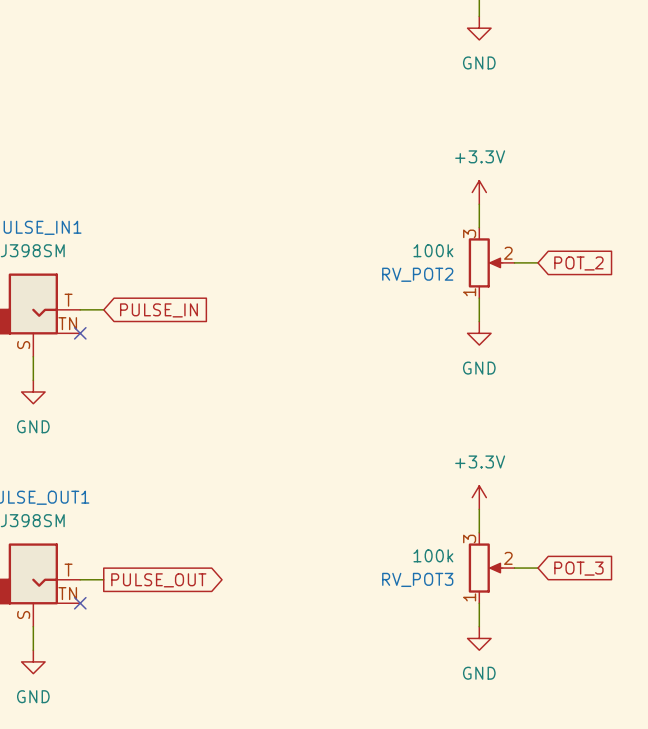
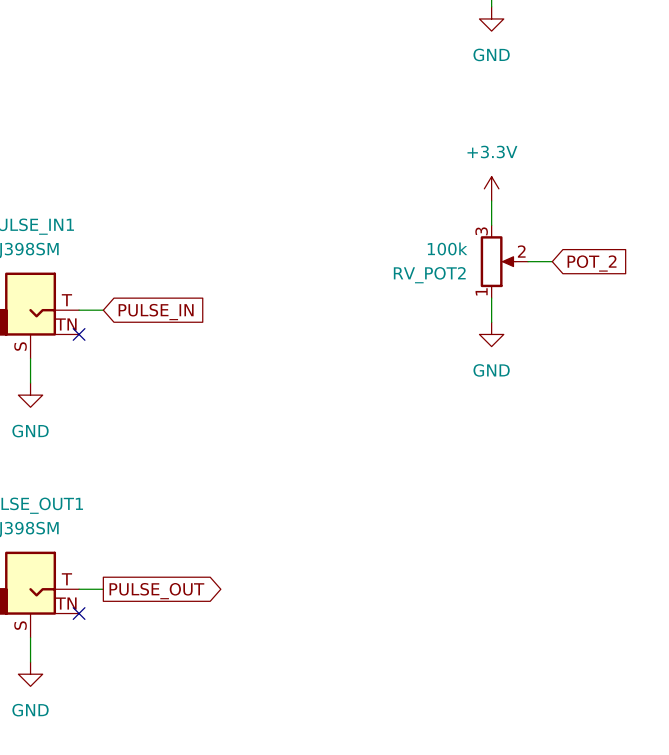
power symbol: +3.3V (479, 497) -> none
wire: (479, 509) (479, 532) -> none
RV_POT3: 100k (491, 568) -> none
wire: (514, 568) (537, 568) -> none
global label: POT_3 (578, 568) -> none
wire: (479, 603) (479, 626) -> none
power symbol: GND (479, 638) -> none

